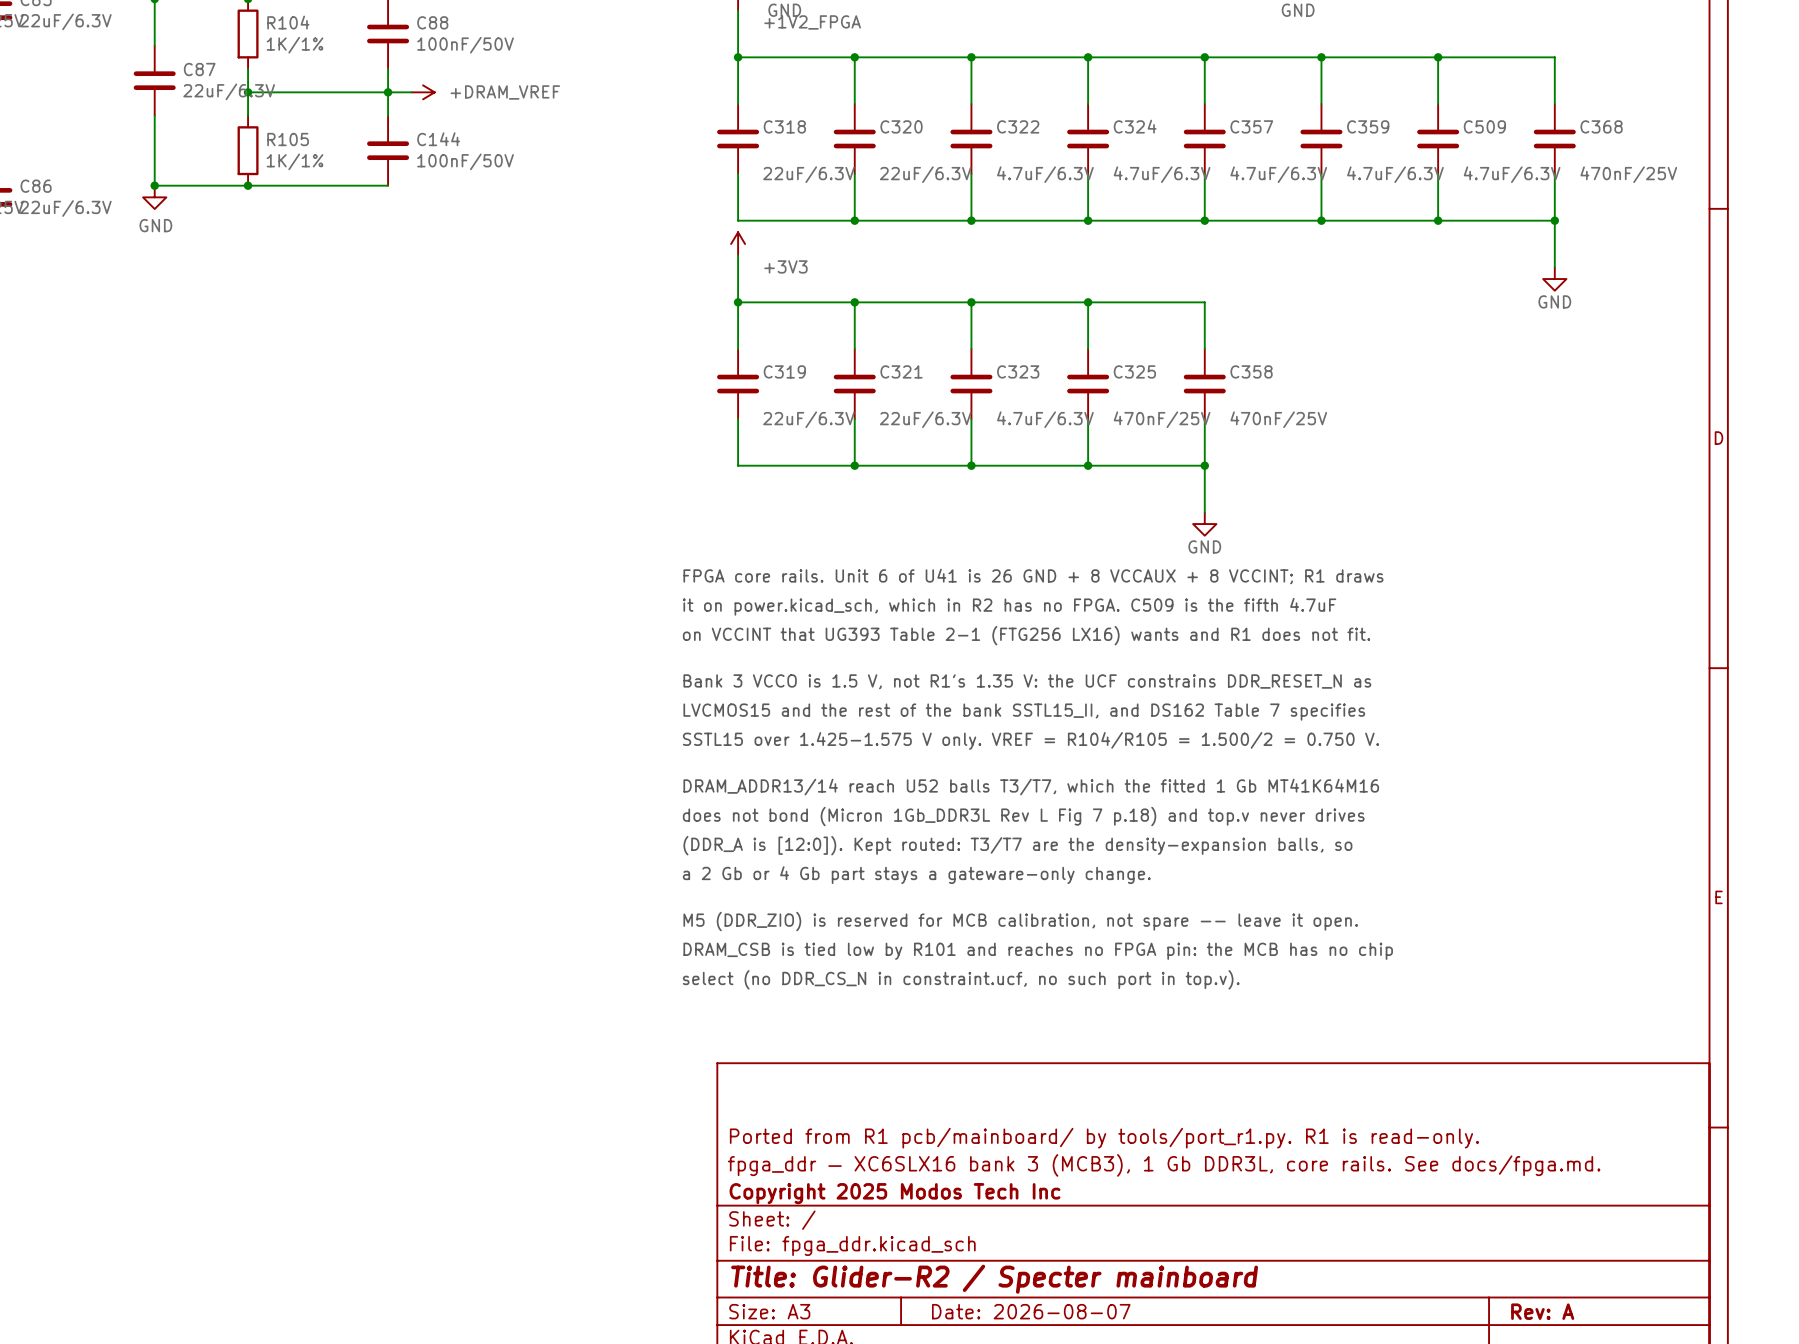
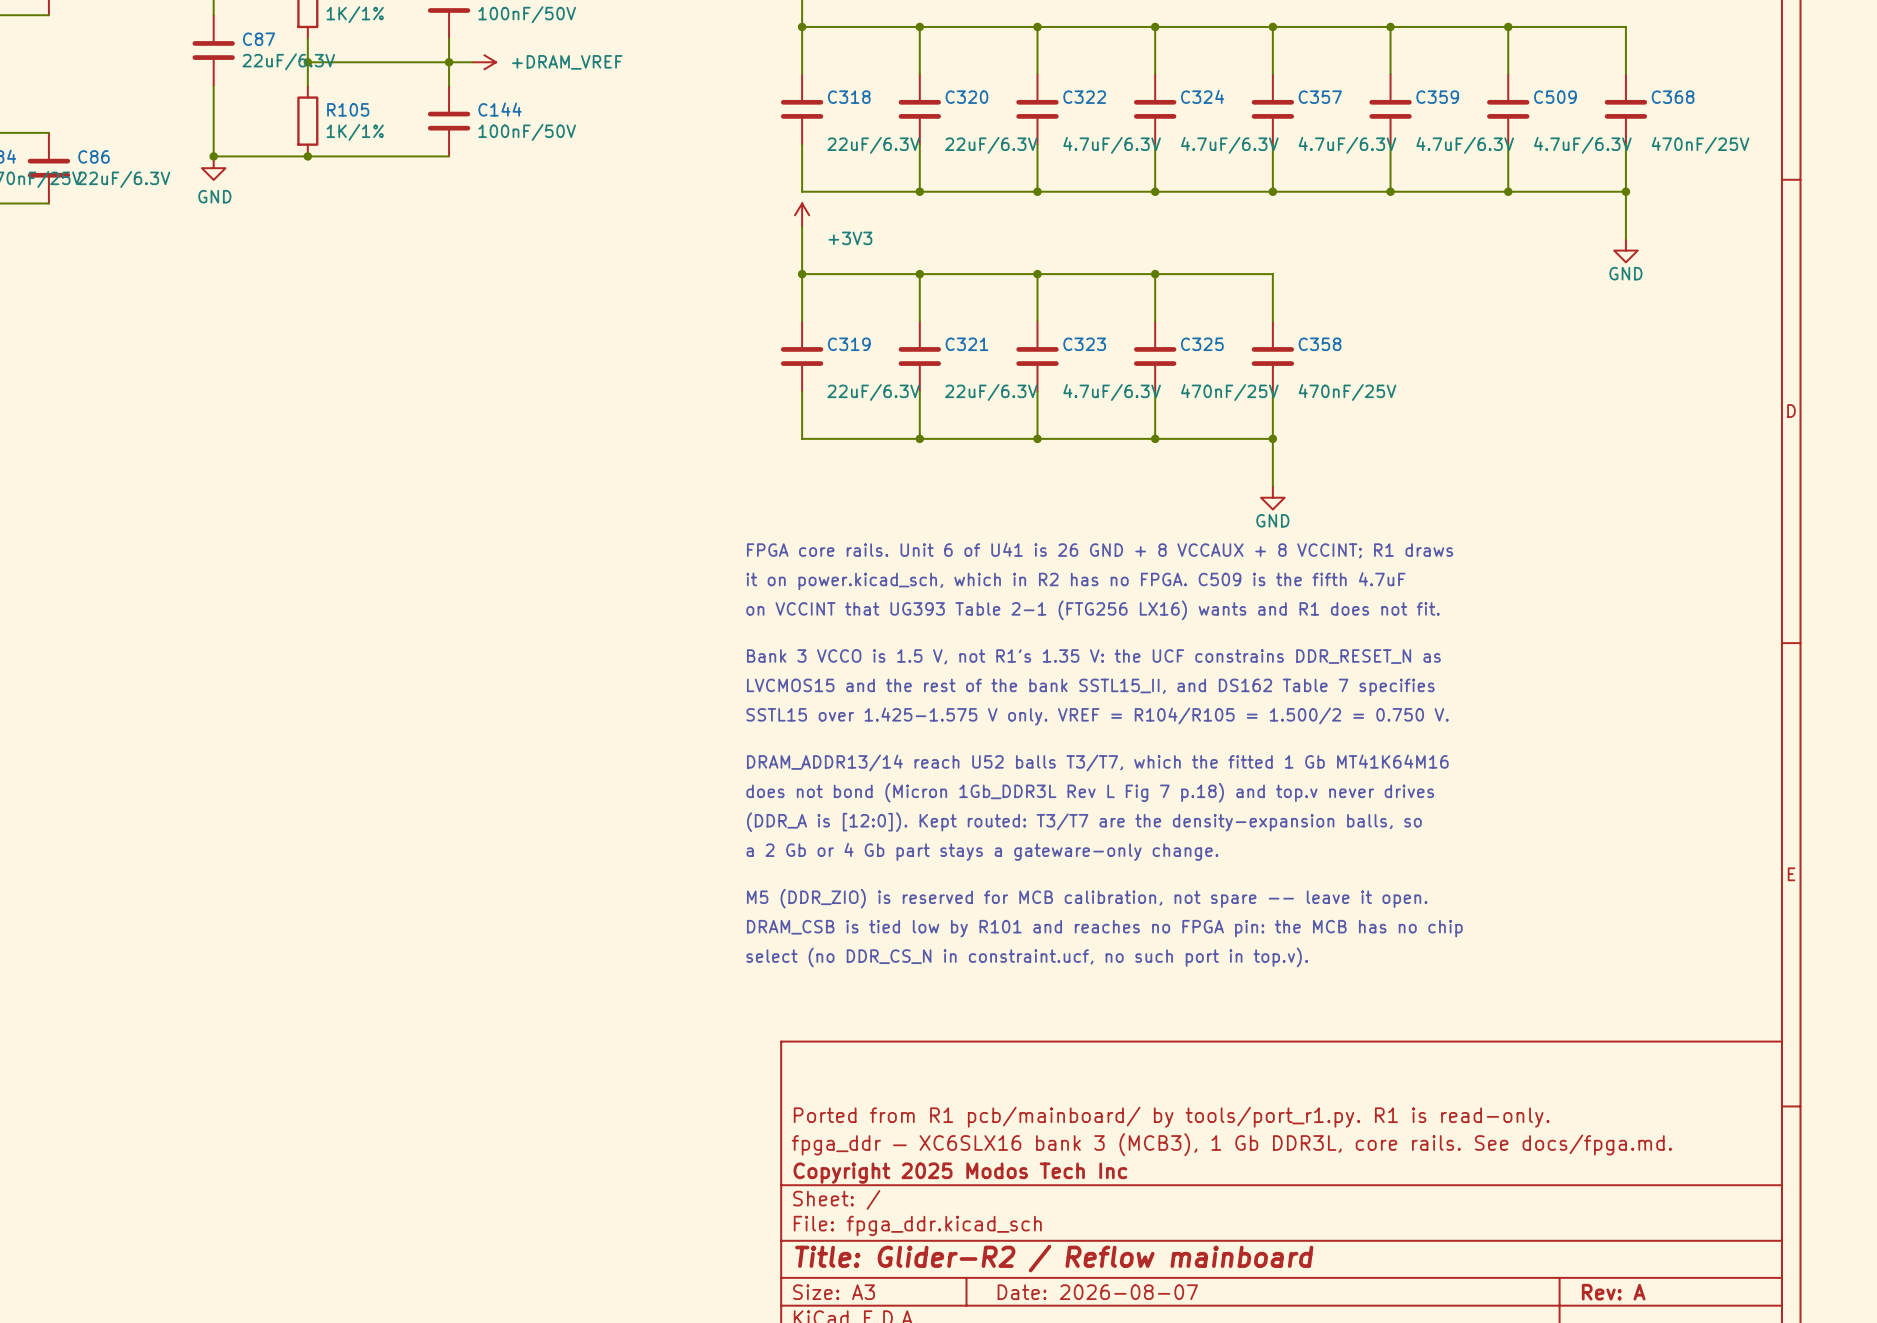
title block: Title: Glider-R2 / Specter mainboard (994, 1279) -> Title: Glider-R2 / Reflow mainboard (1054, 1258)

